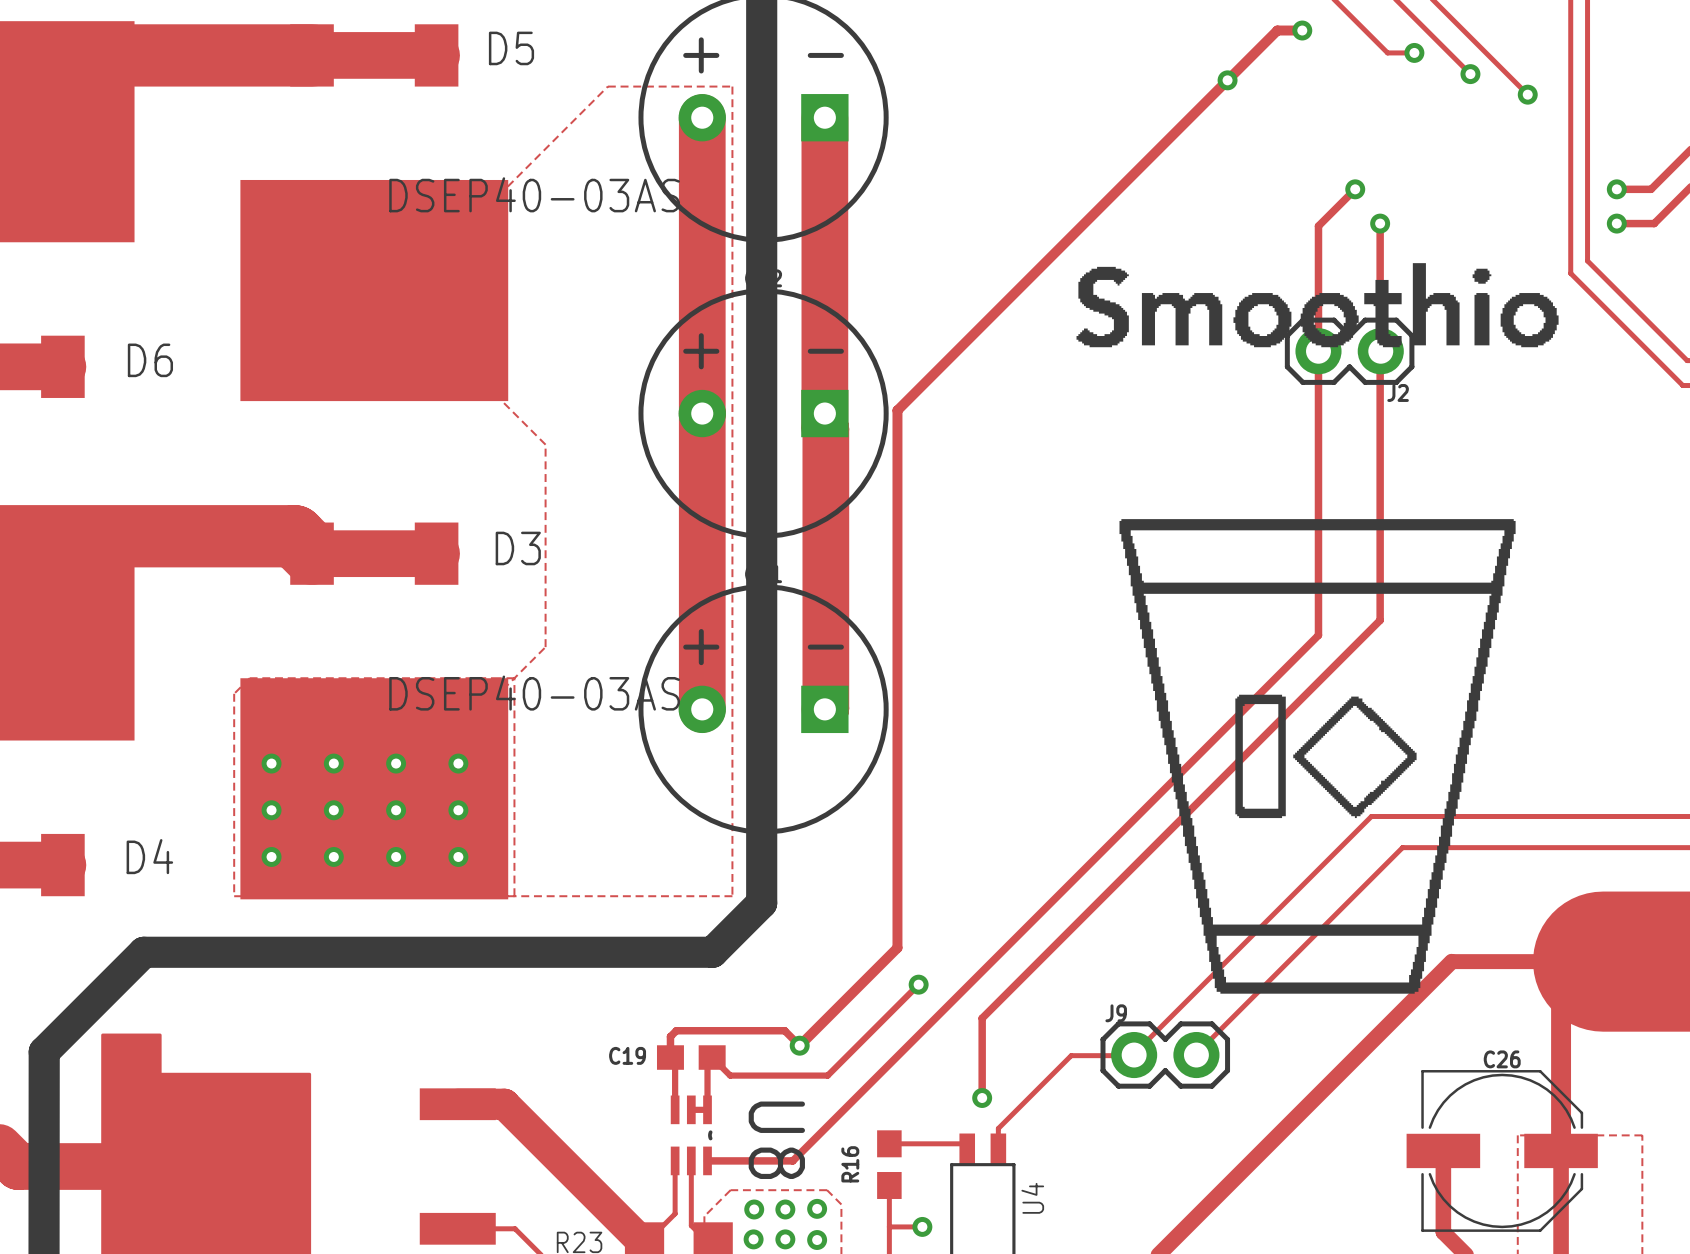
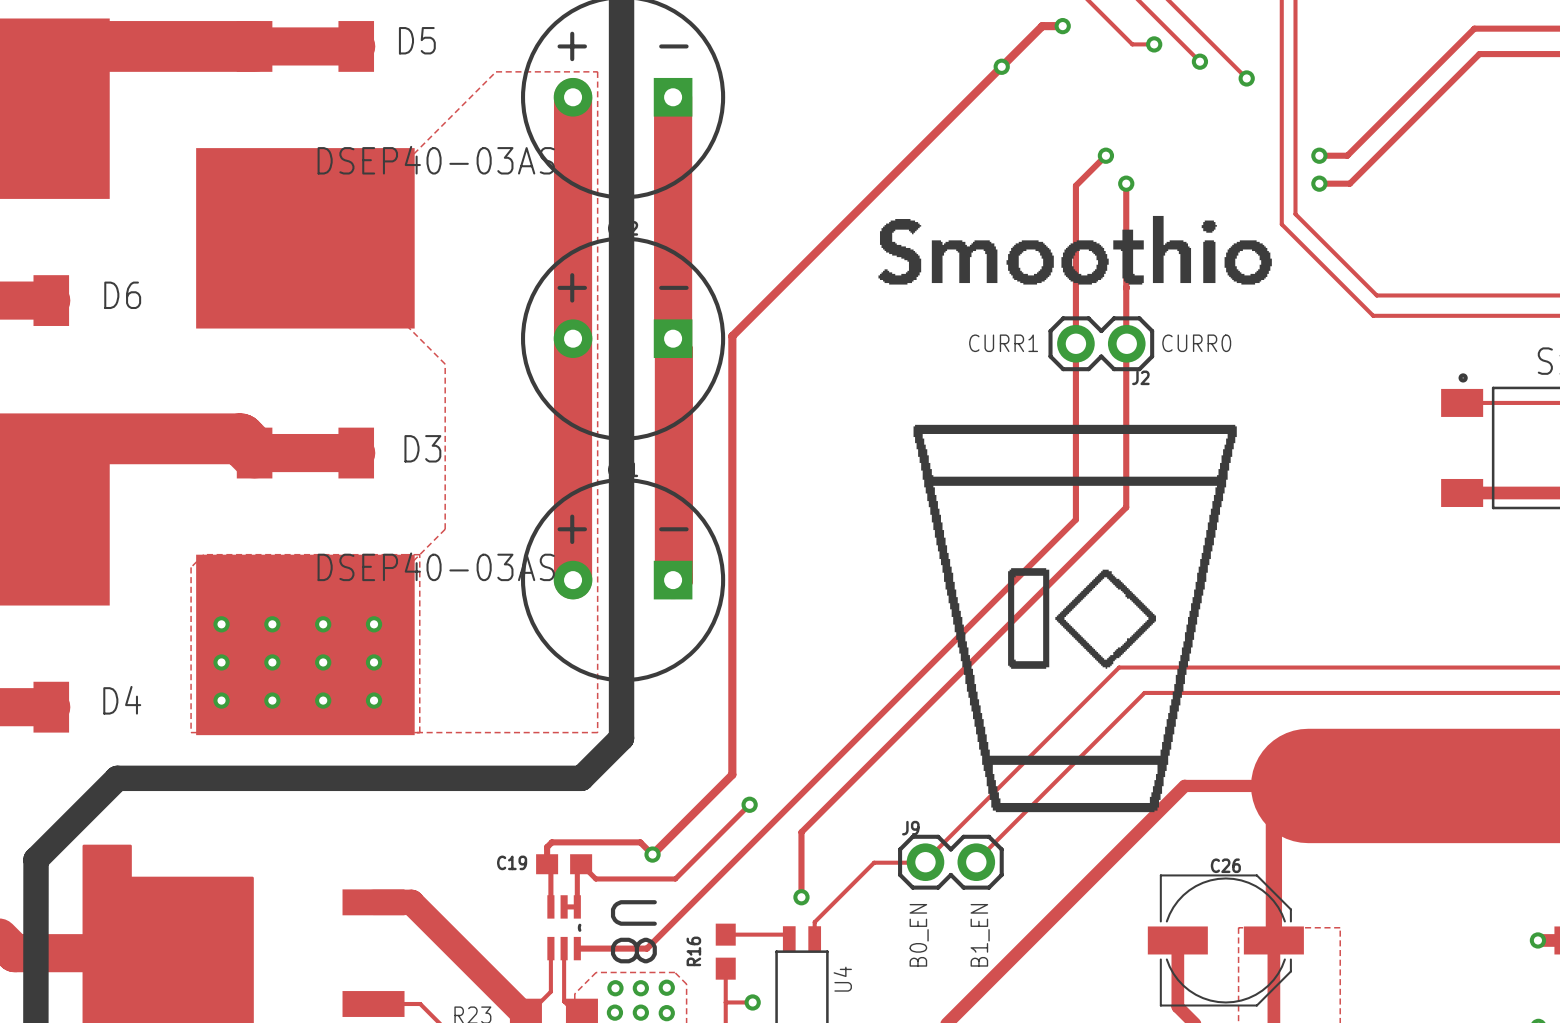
J2 position: (1349, 351) -> (1101, 343)
text: none -> CURR1 (1003, 343)
text: none -> CURR0 (1196, 343)
text: none -> B0_EN (919, 935)
text: none -> B1_EN (980, 935)

